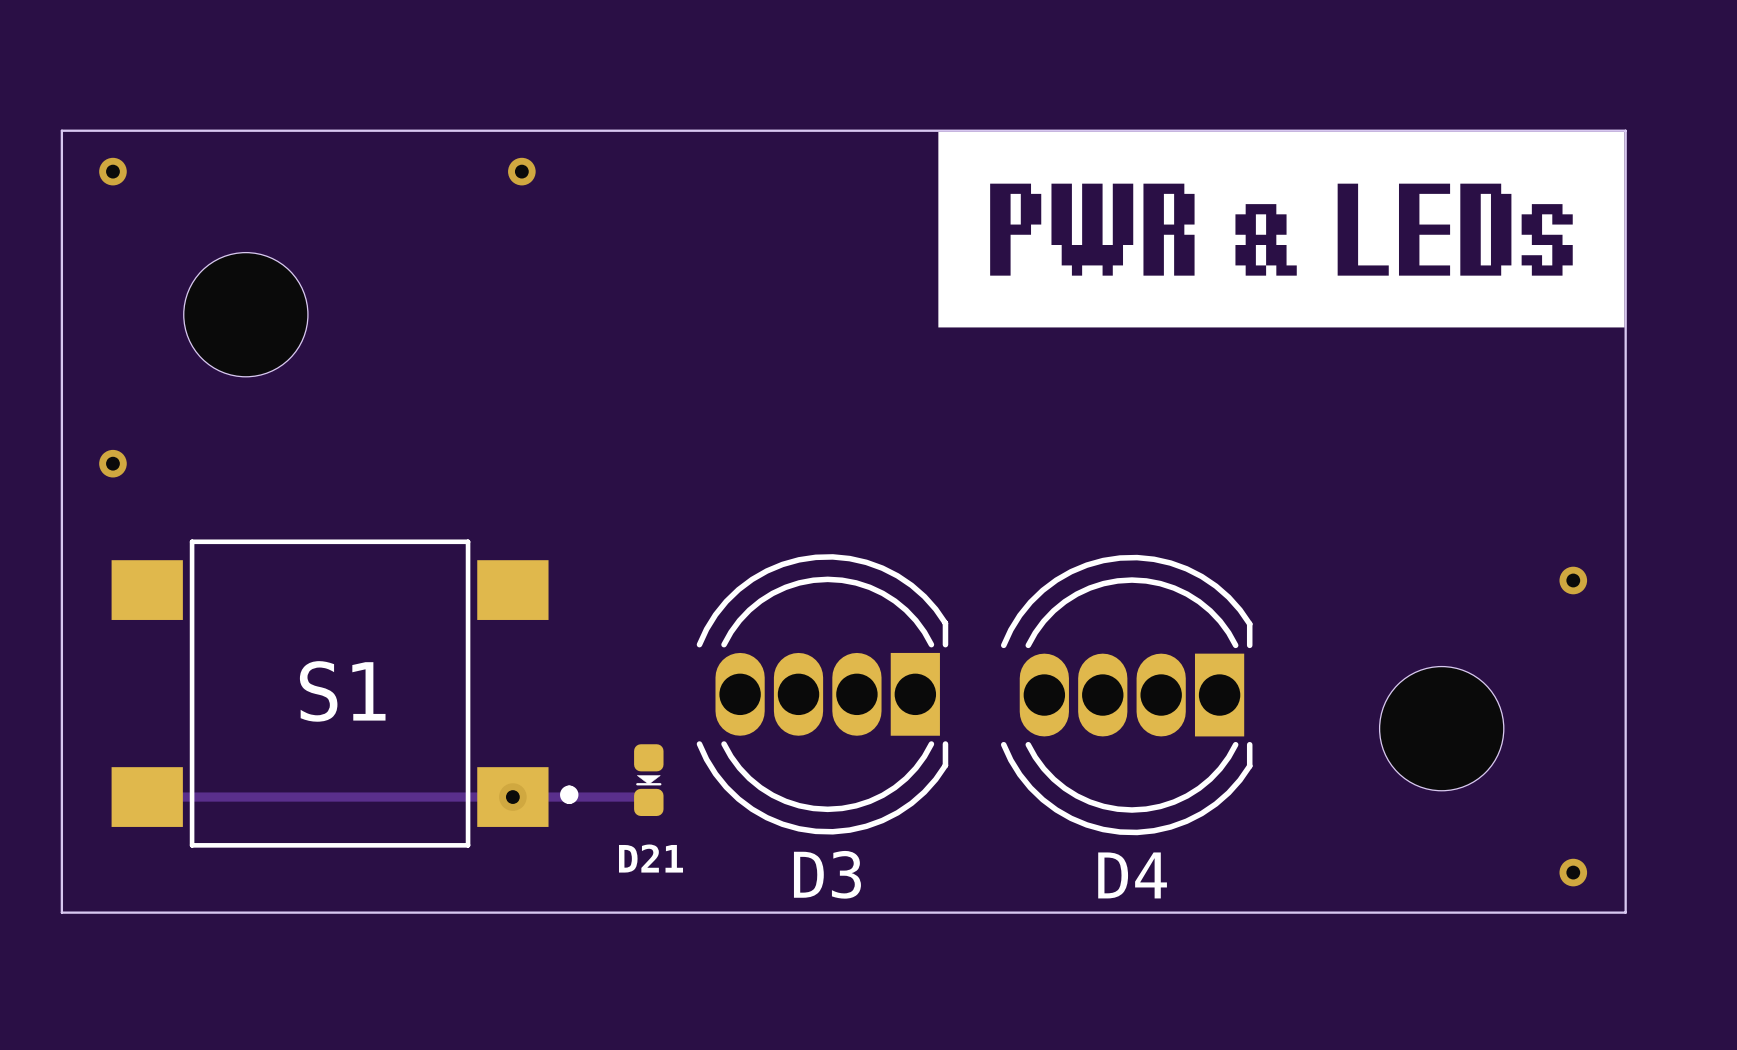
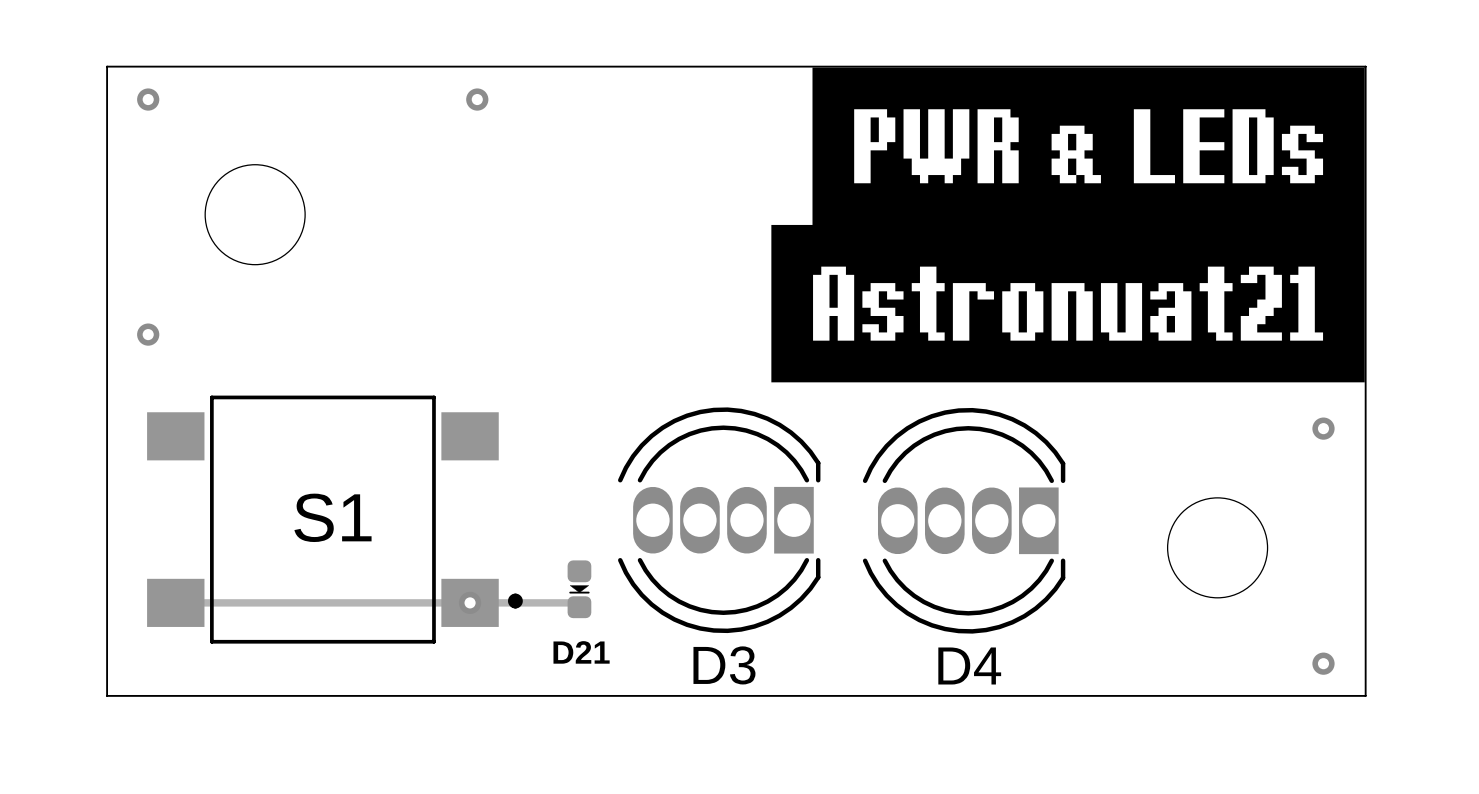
drawing: none -> [771, 224, 1365, 383]

